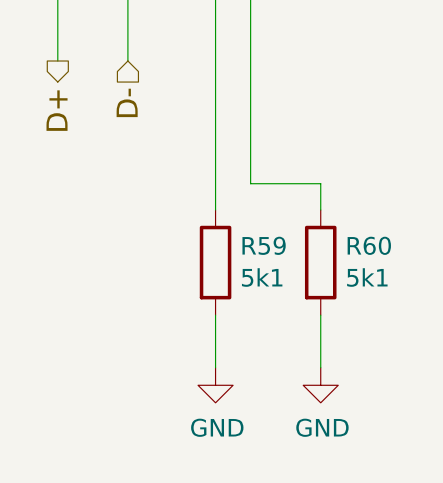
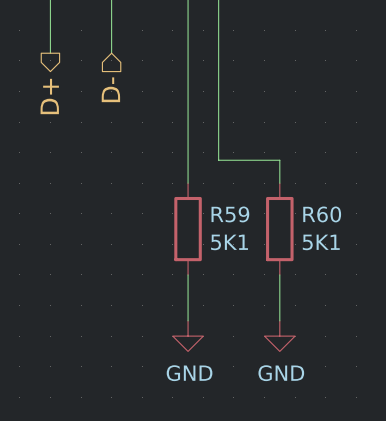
R59 value: 5k1 (262, 277) -> 5K1 (229, 242)
R60 value: 5k1 (367, 277) -> 5K1 (321, 242)

